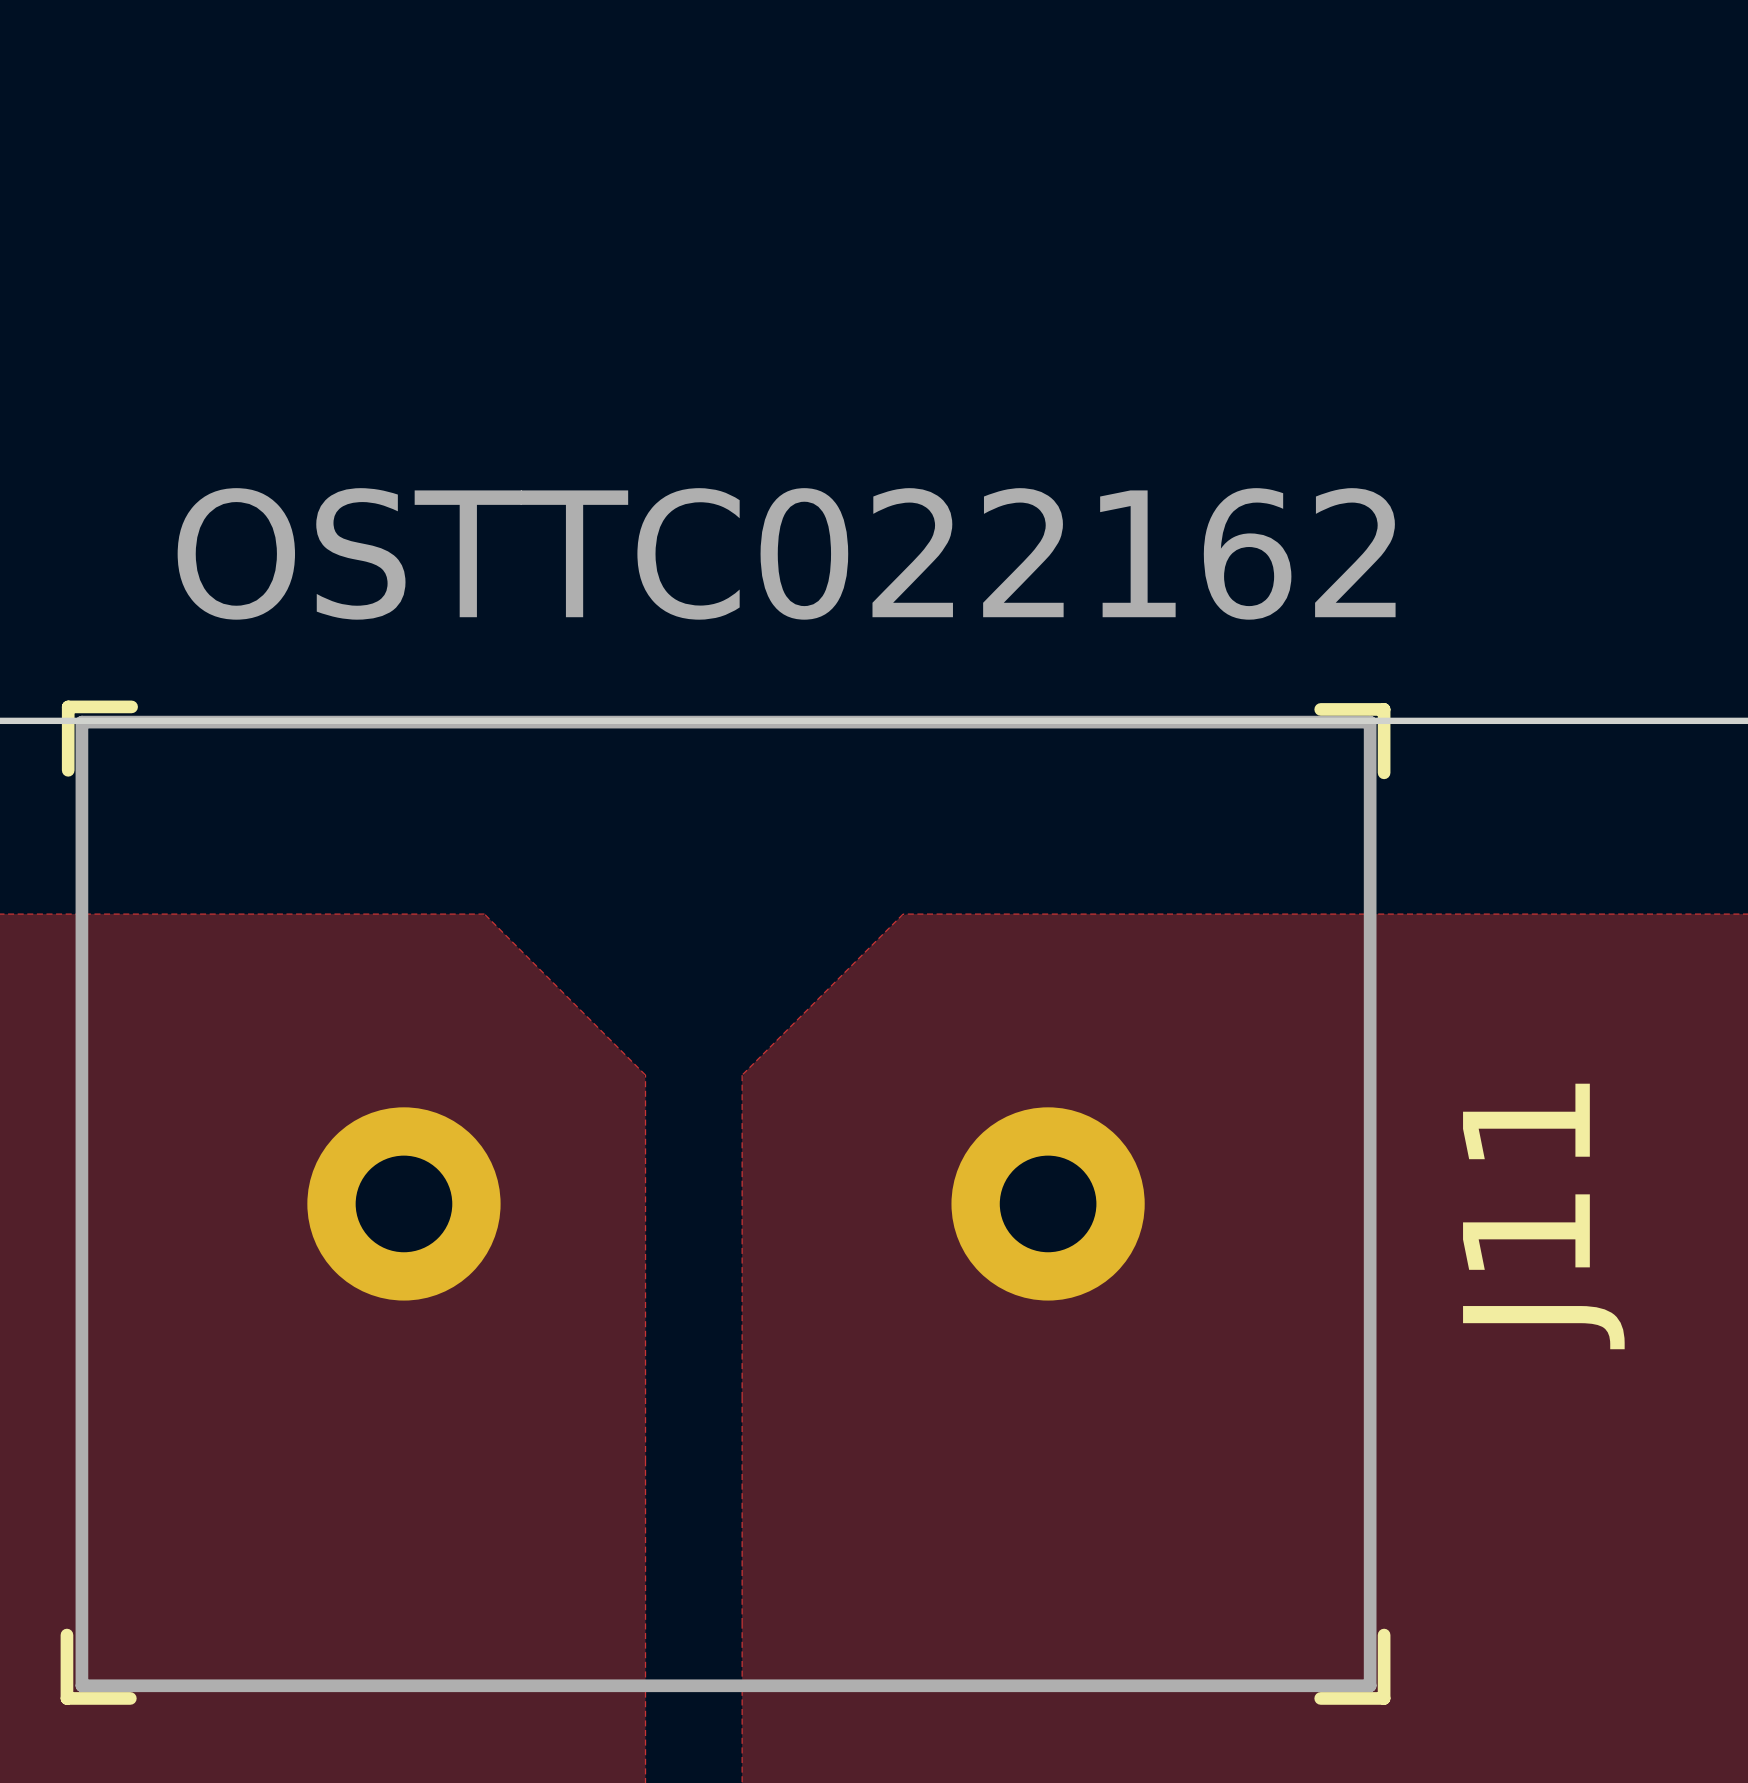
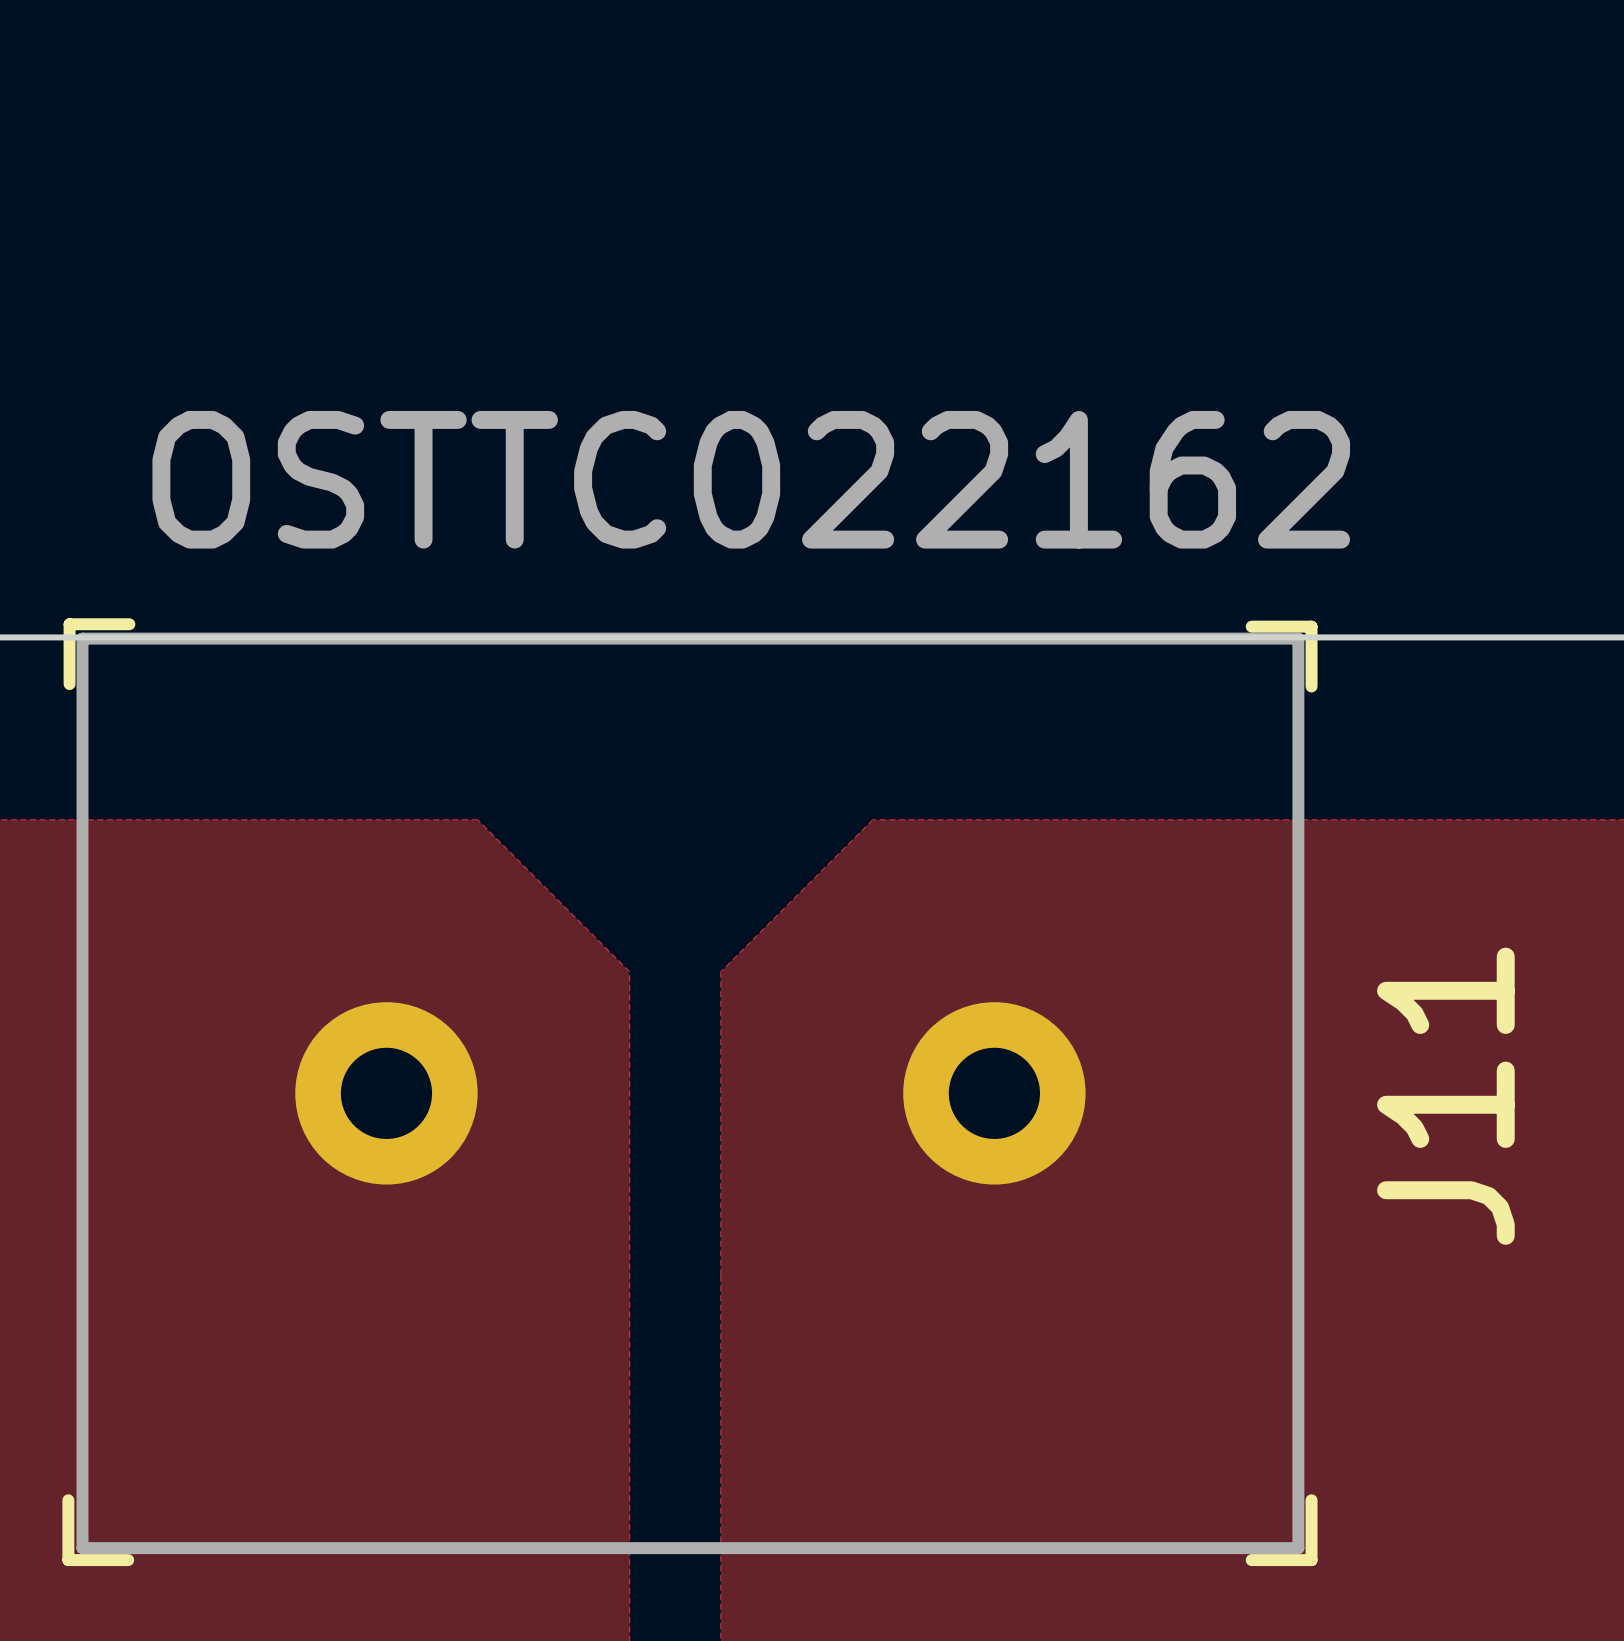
J11 position: (725, 1202) -> (689, 1092)

